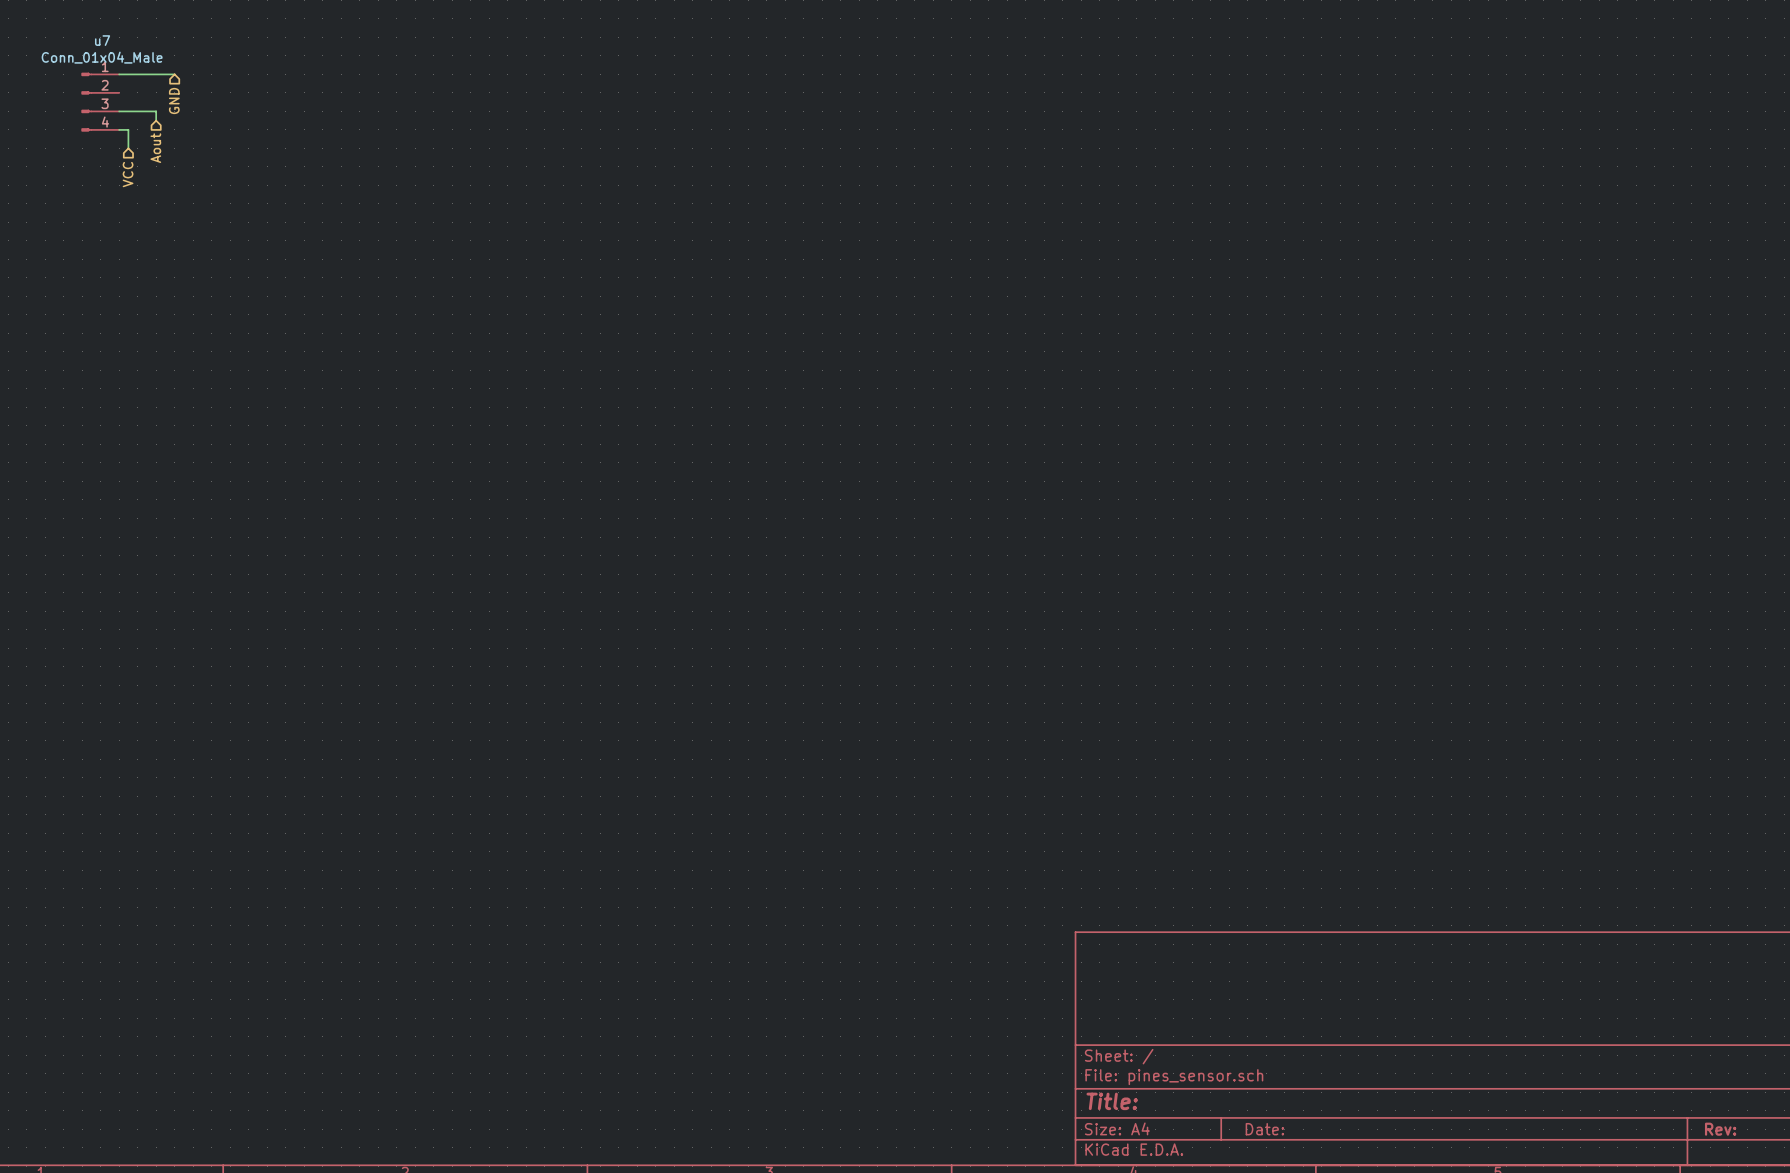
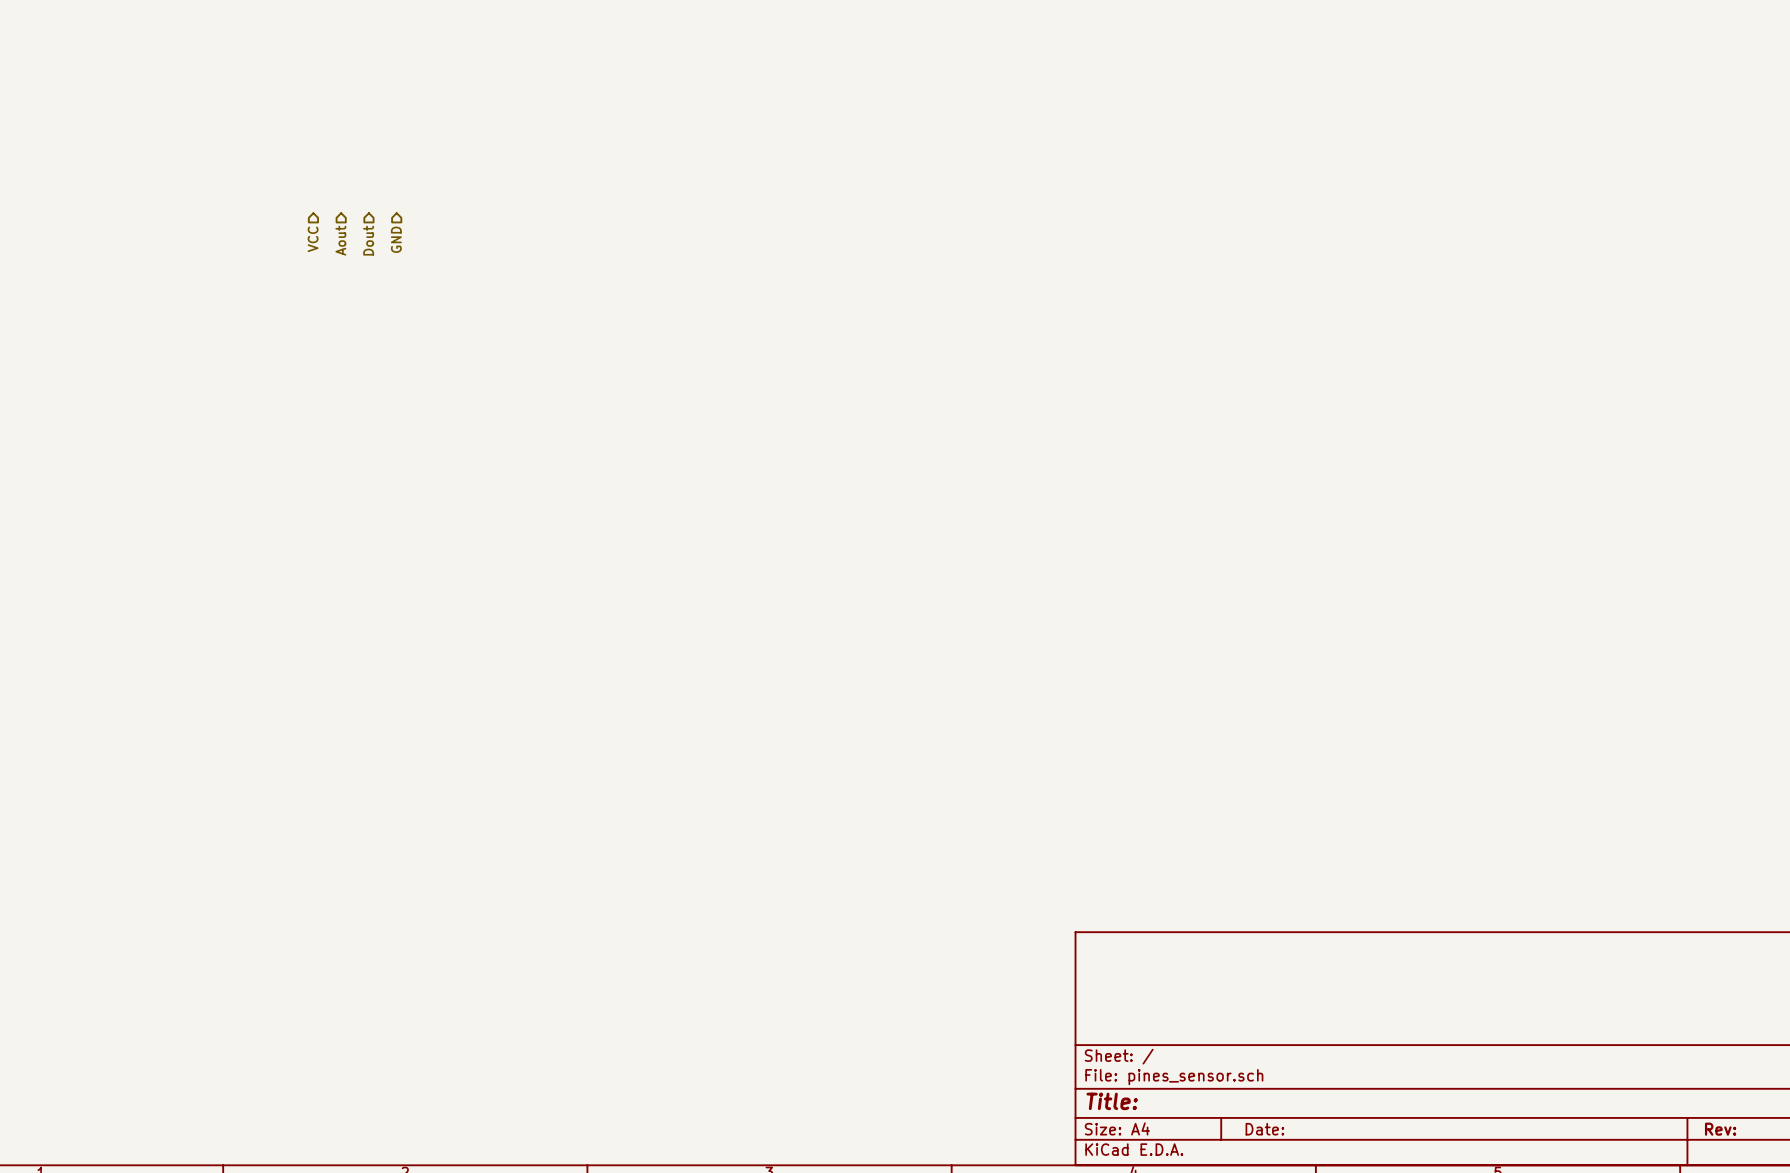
wire: (119, 74) (174, 74) -> none
hierarchical label: GND (174, 100) -> none
u7: Conn_01x04_Male (100, 102) -> none
wire: (119, 111) (156, 111) (156, 120) -> none
wire: (119, 129) (128, 129) (128, 148) -> none
hierarchical label: Aout (155, 148) -> none
hierarchical label: VCC (128, 174) -> none
hierarchical label: none -> VCC (313, 239)
hierarchical label: none -> GND (396, 239)
hierarchical label: none -> Aout (340, 240)
hierarchical label: none -> Dout (368, 240)

